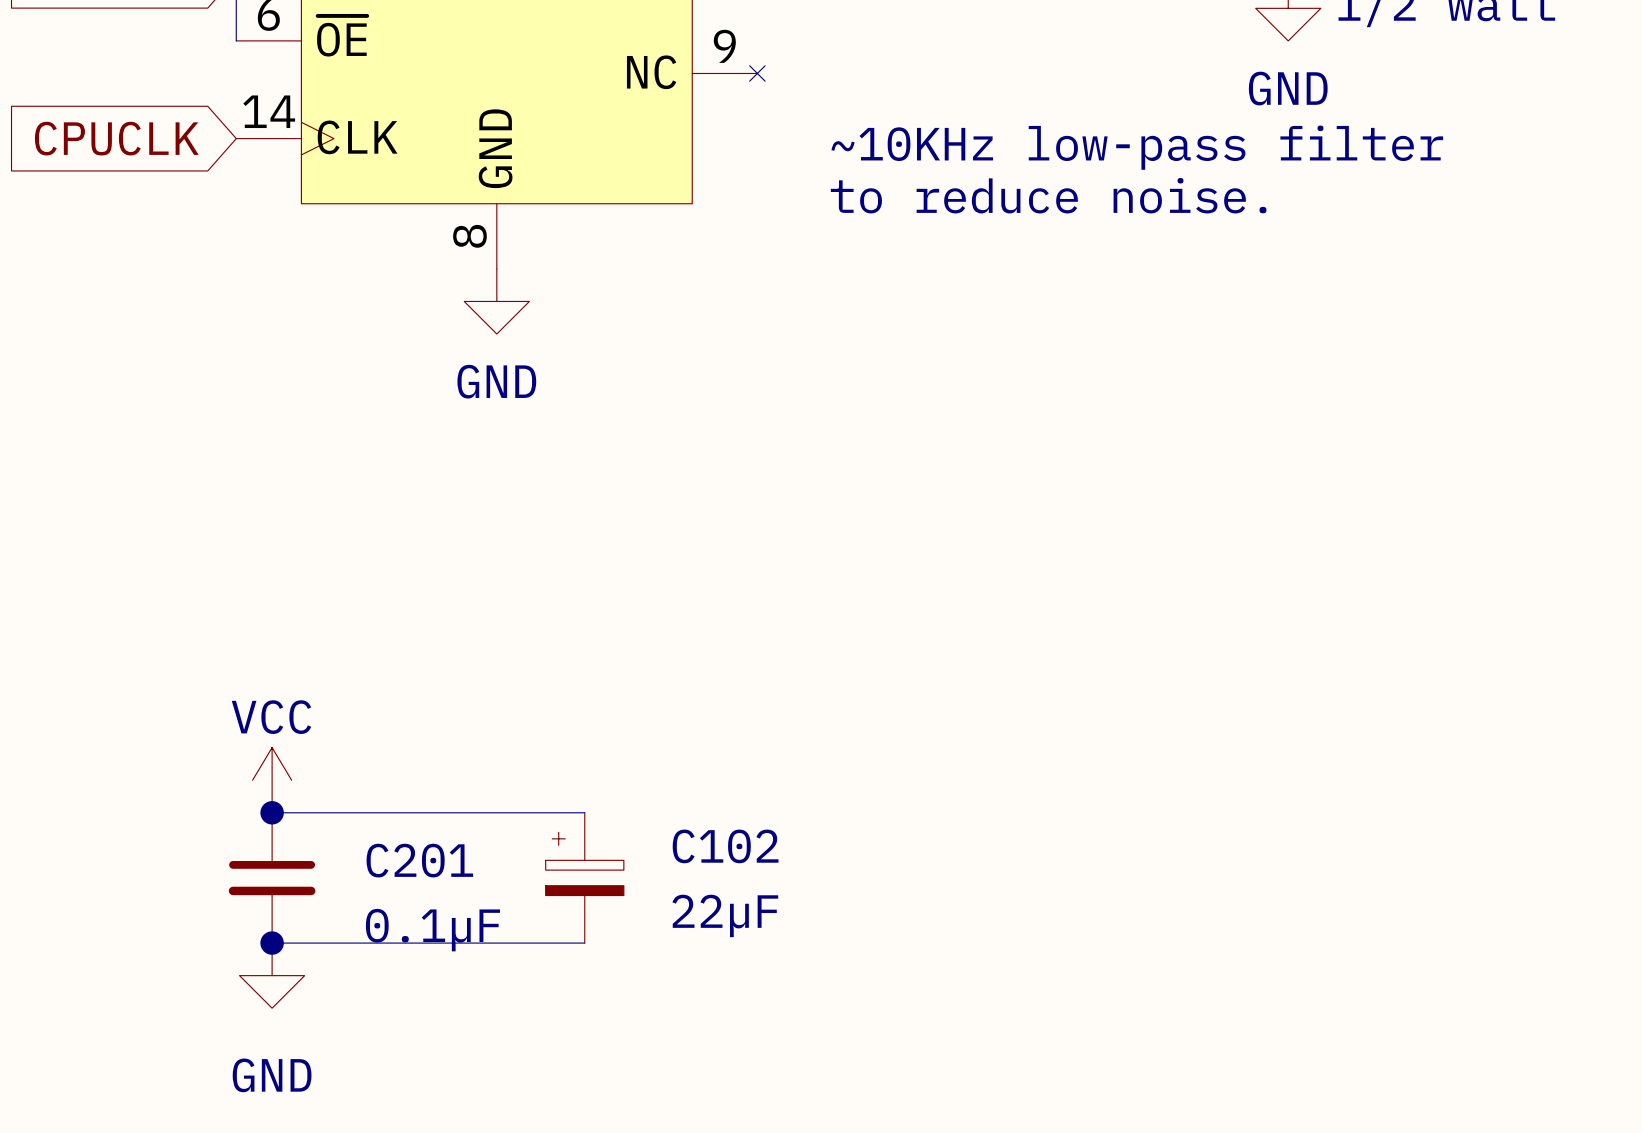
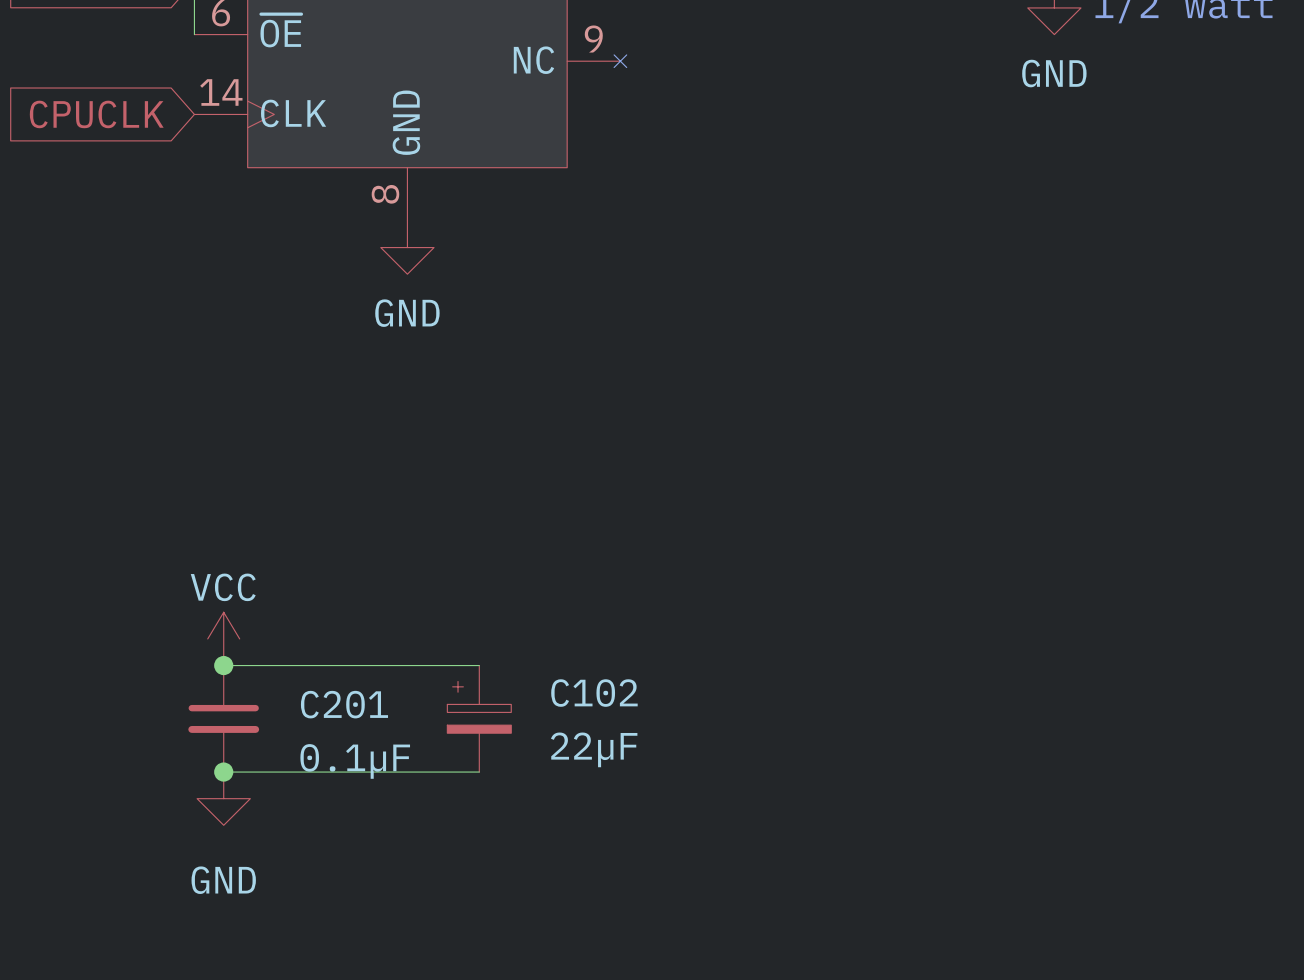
text: ~10KHz low-pass filter (1137, 147) -> none
text: to reduce noise. (1048, 195) -> none

